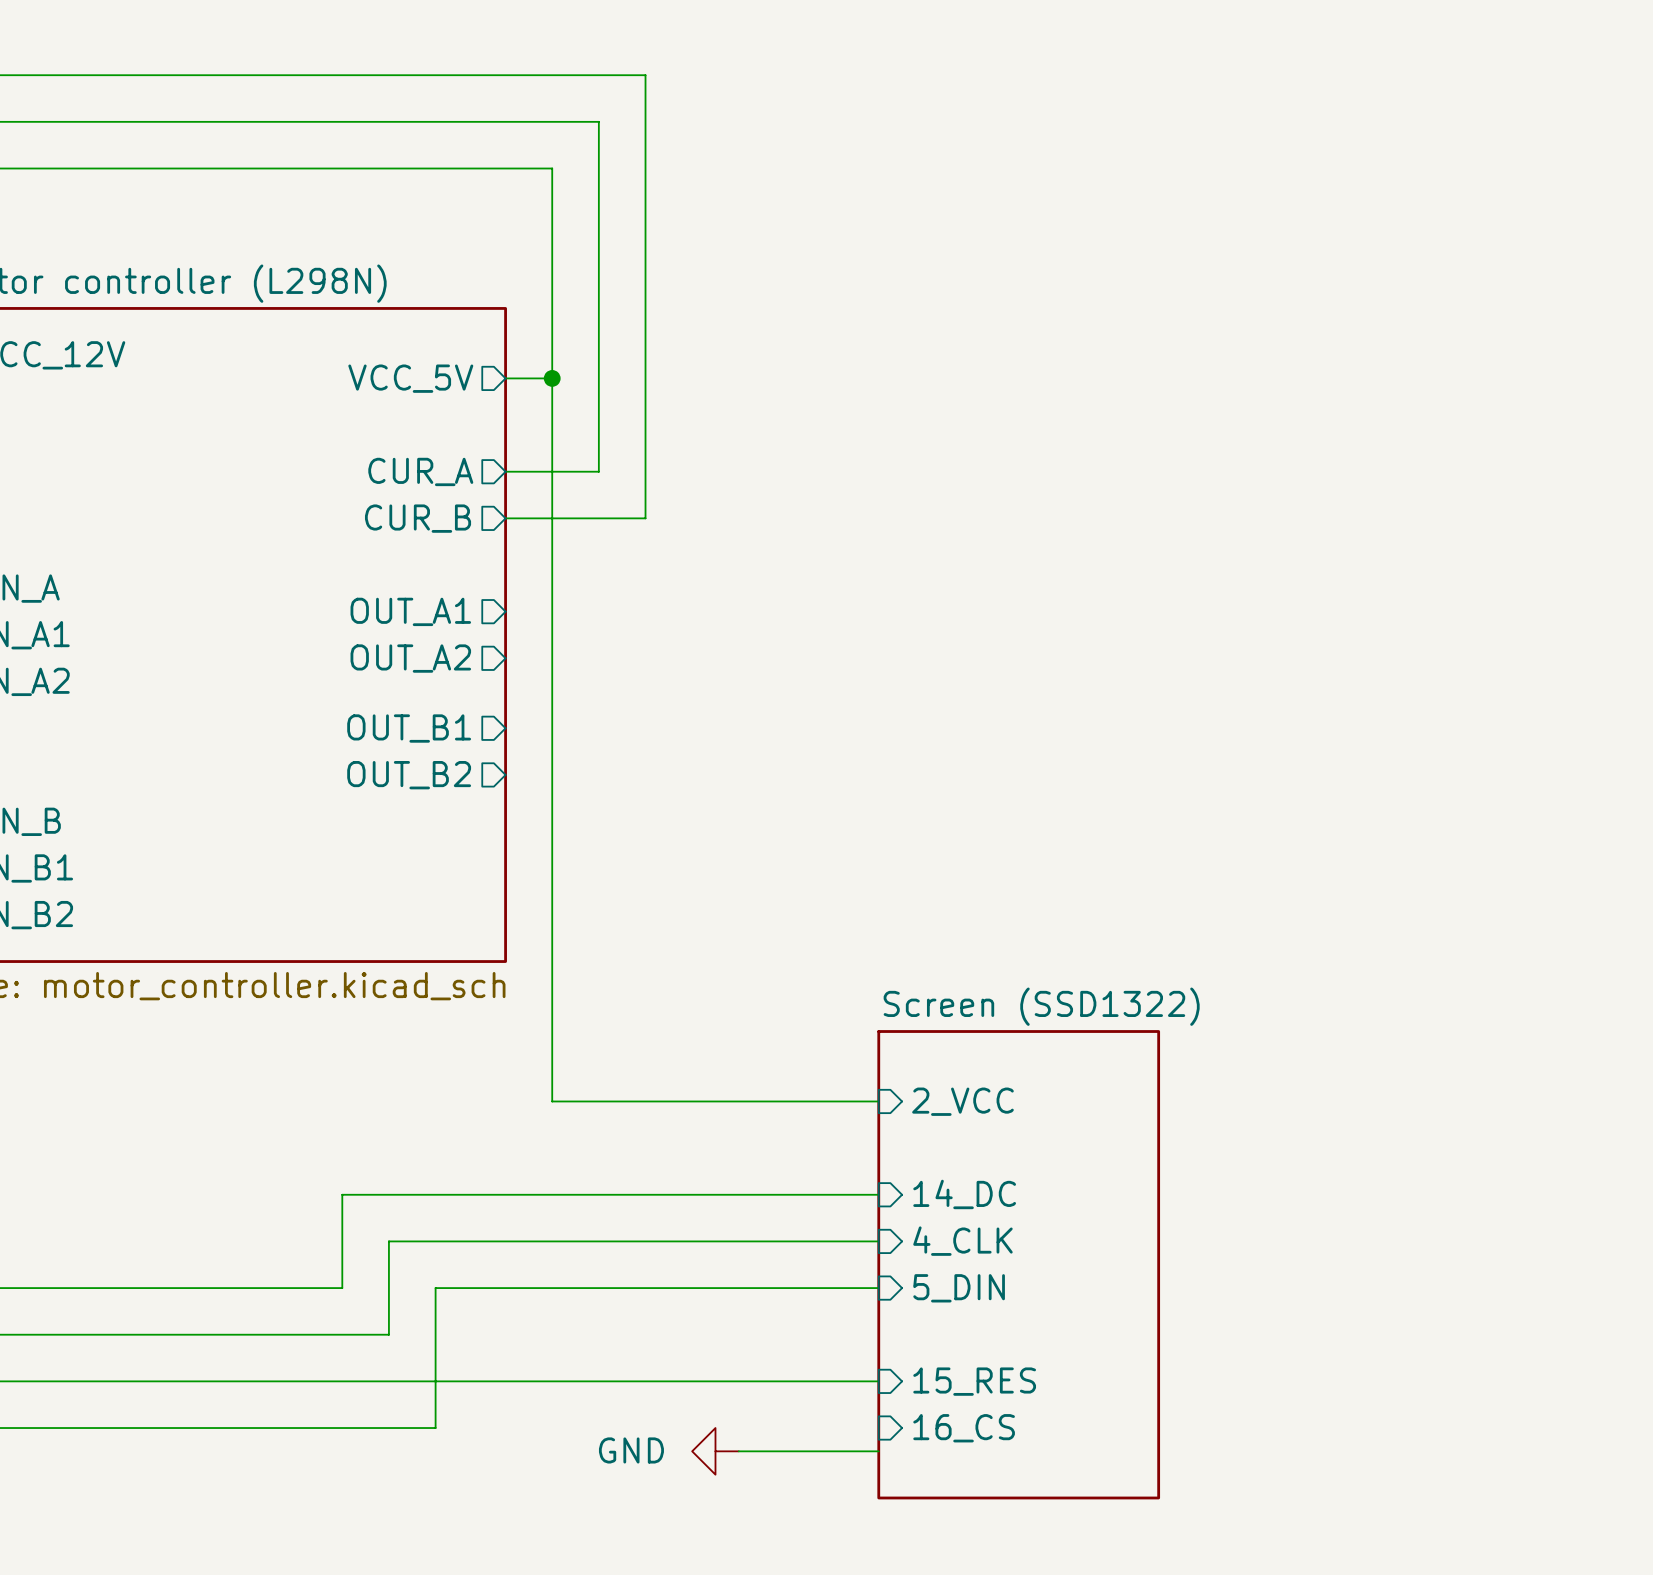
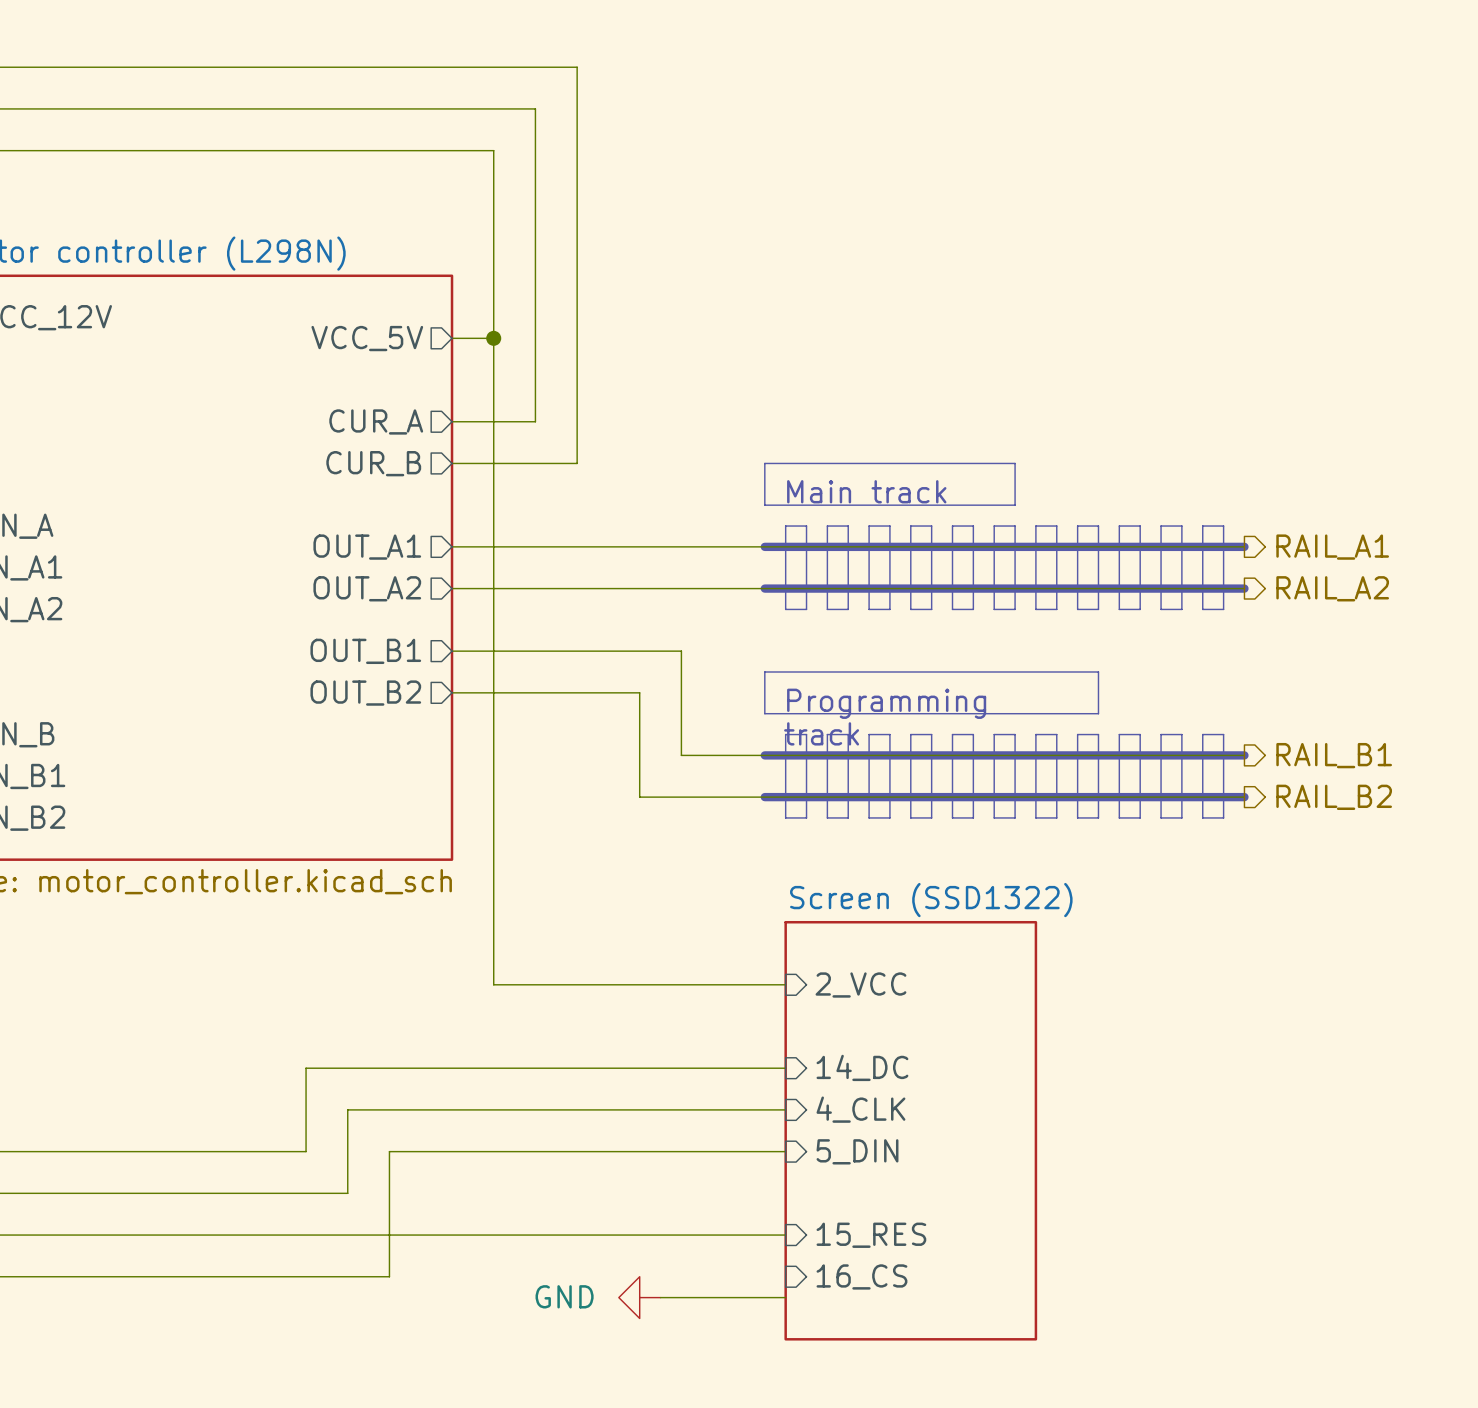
line: none -> (764, 463) (764, 505) (1015, 505) (1015, 463) (764, 463)
text: none -> Main track (866, 491)
line: none -> (785, 526) (806, 526) (806, 609) (785, 609) (785, 526)
line: none -> (827, 526) (848, 526) (848, 609) (827, 609) (827, 526)
line: none -> (869, 526) (889, 526) (889, 609) (869, 609) (869, 526)
line: none -> (910, 526) (910, 609) (931, 609) (931, 526) (910, 526)
line: none -> (952, 526) (973, 526) (973, 609) (952, 609) (952, 526)
line: none -> (994, 526) (1015, 526) (1015, 609) (994, 609) (994, 526)
line: none -> (1035, 526) (1056, 526) (1056, 609) (1035, 609) (1035, 526)
line: none -> (1077, 526) (1077, 609) (1098, 609) (1098, 526) (1077, 526)
line: none -> (1119, 526) (1140, 526) (1140, 609) (1119, 609) (1119, 526)
line: none -> (1161, 526) (1161, 609) (1181, 609) (1181, 526) (1161, 526)
line: none -> (1202, 526) (1223, 526) (1223, 609) (1202, 609) (1202, 526)
wire: none -> (452, 546) (1244, 546)
line: none -> (764, 546) (1244, 546)
hierarchical label: none -> RAIL_A1 (1332, 547)
wire: none -> (452, 588) (1244, 588)
line: none -> (764, 588) (1244, 588)
hierarchical label: none -> RAIL_A2 (1332, 588)
wire: none -> (452, 651) (681, 651) (681, 755) (1244, 755)
line: none -> (764, 671) (1098, 671) (1098, 713) (764, 713) (764, 671)
wire: none -> (452, 692) (639, 692) (639, 797) (1244, 797)
text: none -> Programming (886, 703)
text: none -> track (821, 733)
line: none -> (785, 734) (806, 734) (806, 817) (785, 817) (785, 734)
line: none -> (827, 734) (848, 734) (848, 817) (827, 817) (827, 734)
line: none -> (869, 734) (889, 734) (889, 817) (869, 817) (869, 734)
line: none -> (910, 734) (931, 734) (931, 817) (910, 817) (910, 734)
line: none -> (952, 734) (973, 734) (973, 817) (952, 817) (952, 734)
line: none -> (994, 734) (1015, 734) (1015, 817) (994, 817) (994, 734)
line: none -> (1035, 734) (1056, 734) (1056, 817) (1035, 817) (1035, 734)
line: none -> (1077, 734) (1098, 734) (1098, 817) (1077, 817) (1077, 734)
line: none -> (1119, 734) (1140, 734) (1140, 817) (1119, 817) (1119, 734)
line: none -> (1161, 734) (1181, 734) (1181, 817) (1161, 817) (1161, 734)
line: none -> (1202, 734) (1223, 734) (1223, 817) (1202, 817) (1202, 734)
line: none -> (764, 755) (1244, 755)
hierarchical label: none -> RAIL_B1 (1334, 755)
line: none -> (764, 797) (1244, 797)
hierarchical label: none -> RAIL_B2 (1334, 797)

